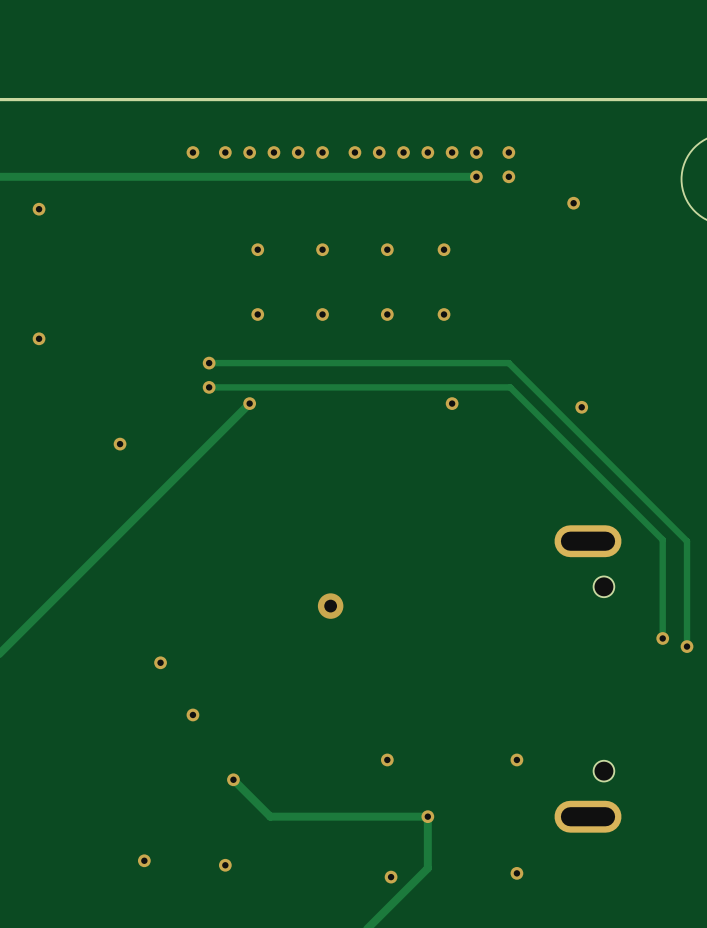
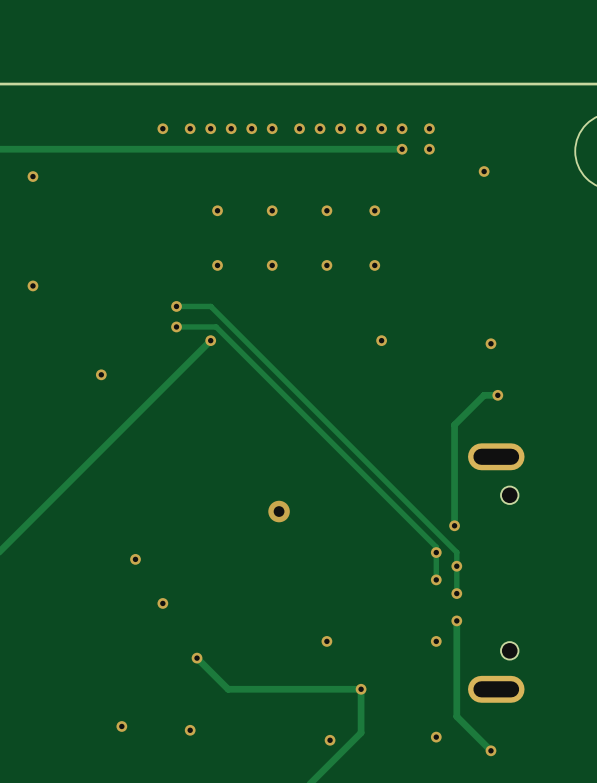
track: (249, 363) (508, 363) (687, 541) (687, 646) -> (210, 306) (456, 552) (456, 593)
track: (256, 387) (510, 387) (662, 539) (662, 638) -> (216, 326) (436, 547) (436, 579)
track: none -> (497, 395) (484, 395) (454, 424) (454, 525)
via: none -> (497, 395)
via: none -> (454, 525)
via: (662, 638) -> none
via: (687, 646) -> none
via: none -> (436, 552)
via: none -> (456, 566)
via: none -> (436, 579)
via: none -> (456, 593)
track: none -> (456, 620) (456, 716) (490, 750)
via: none -> (456, 620)
via: none -> (490, 750)

